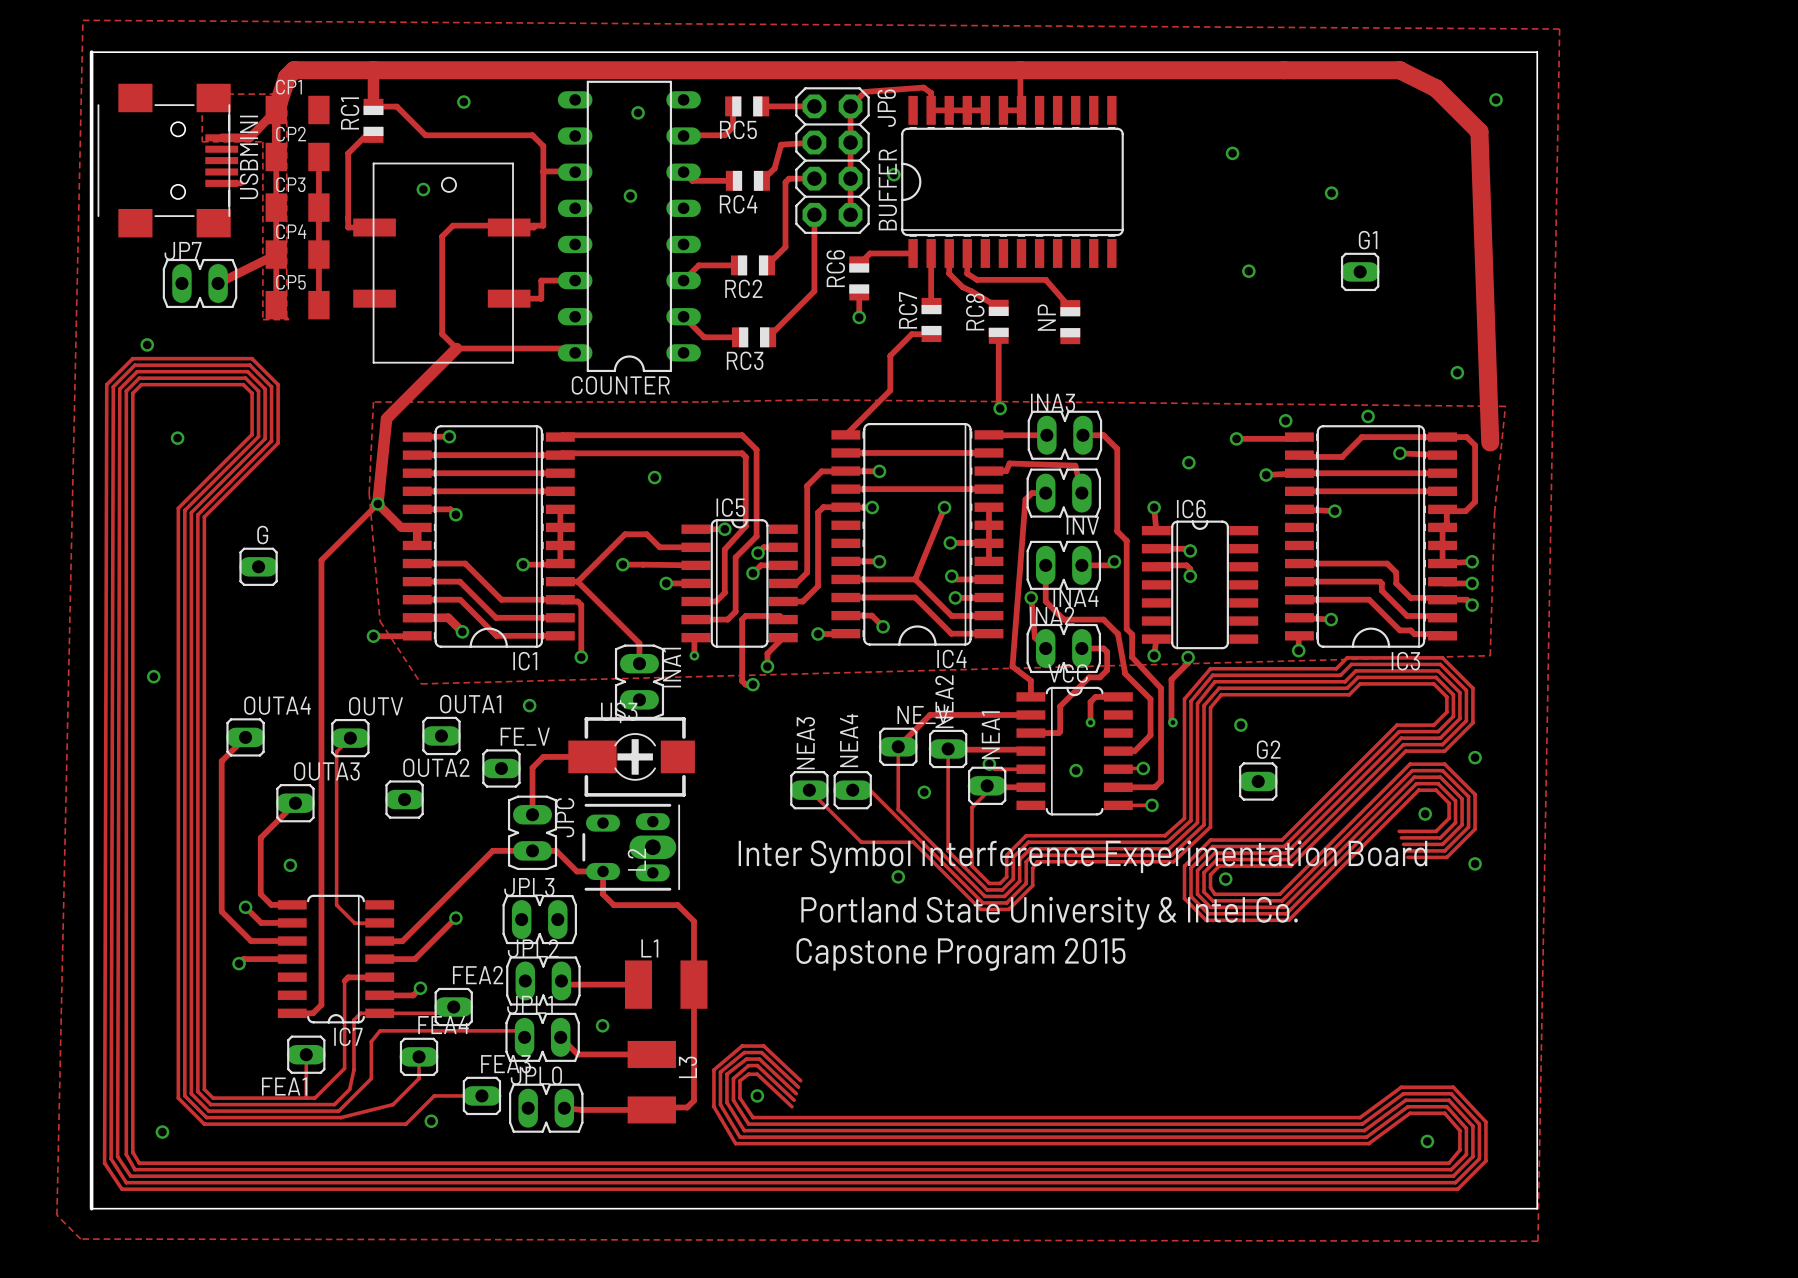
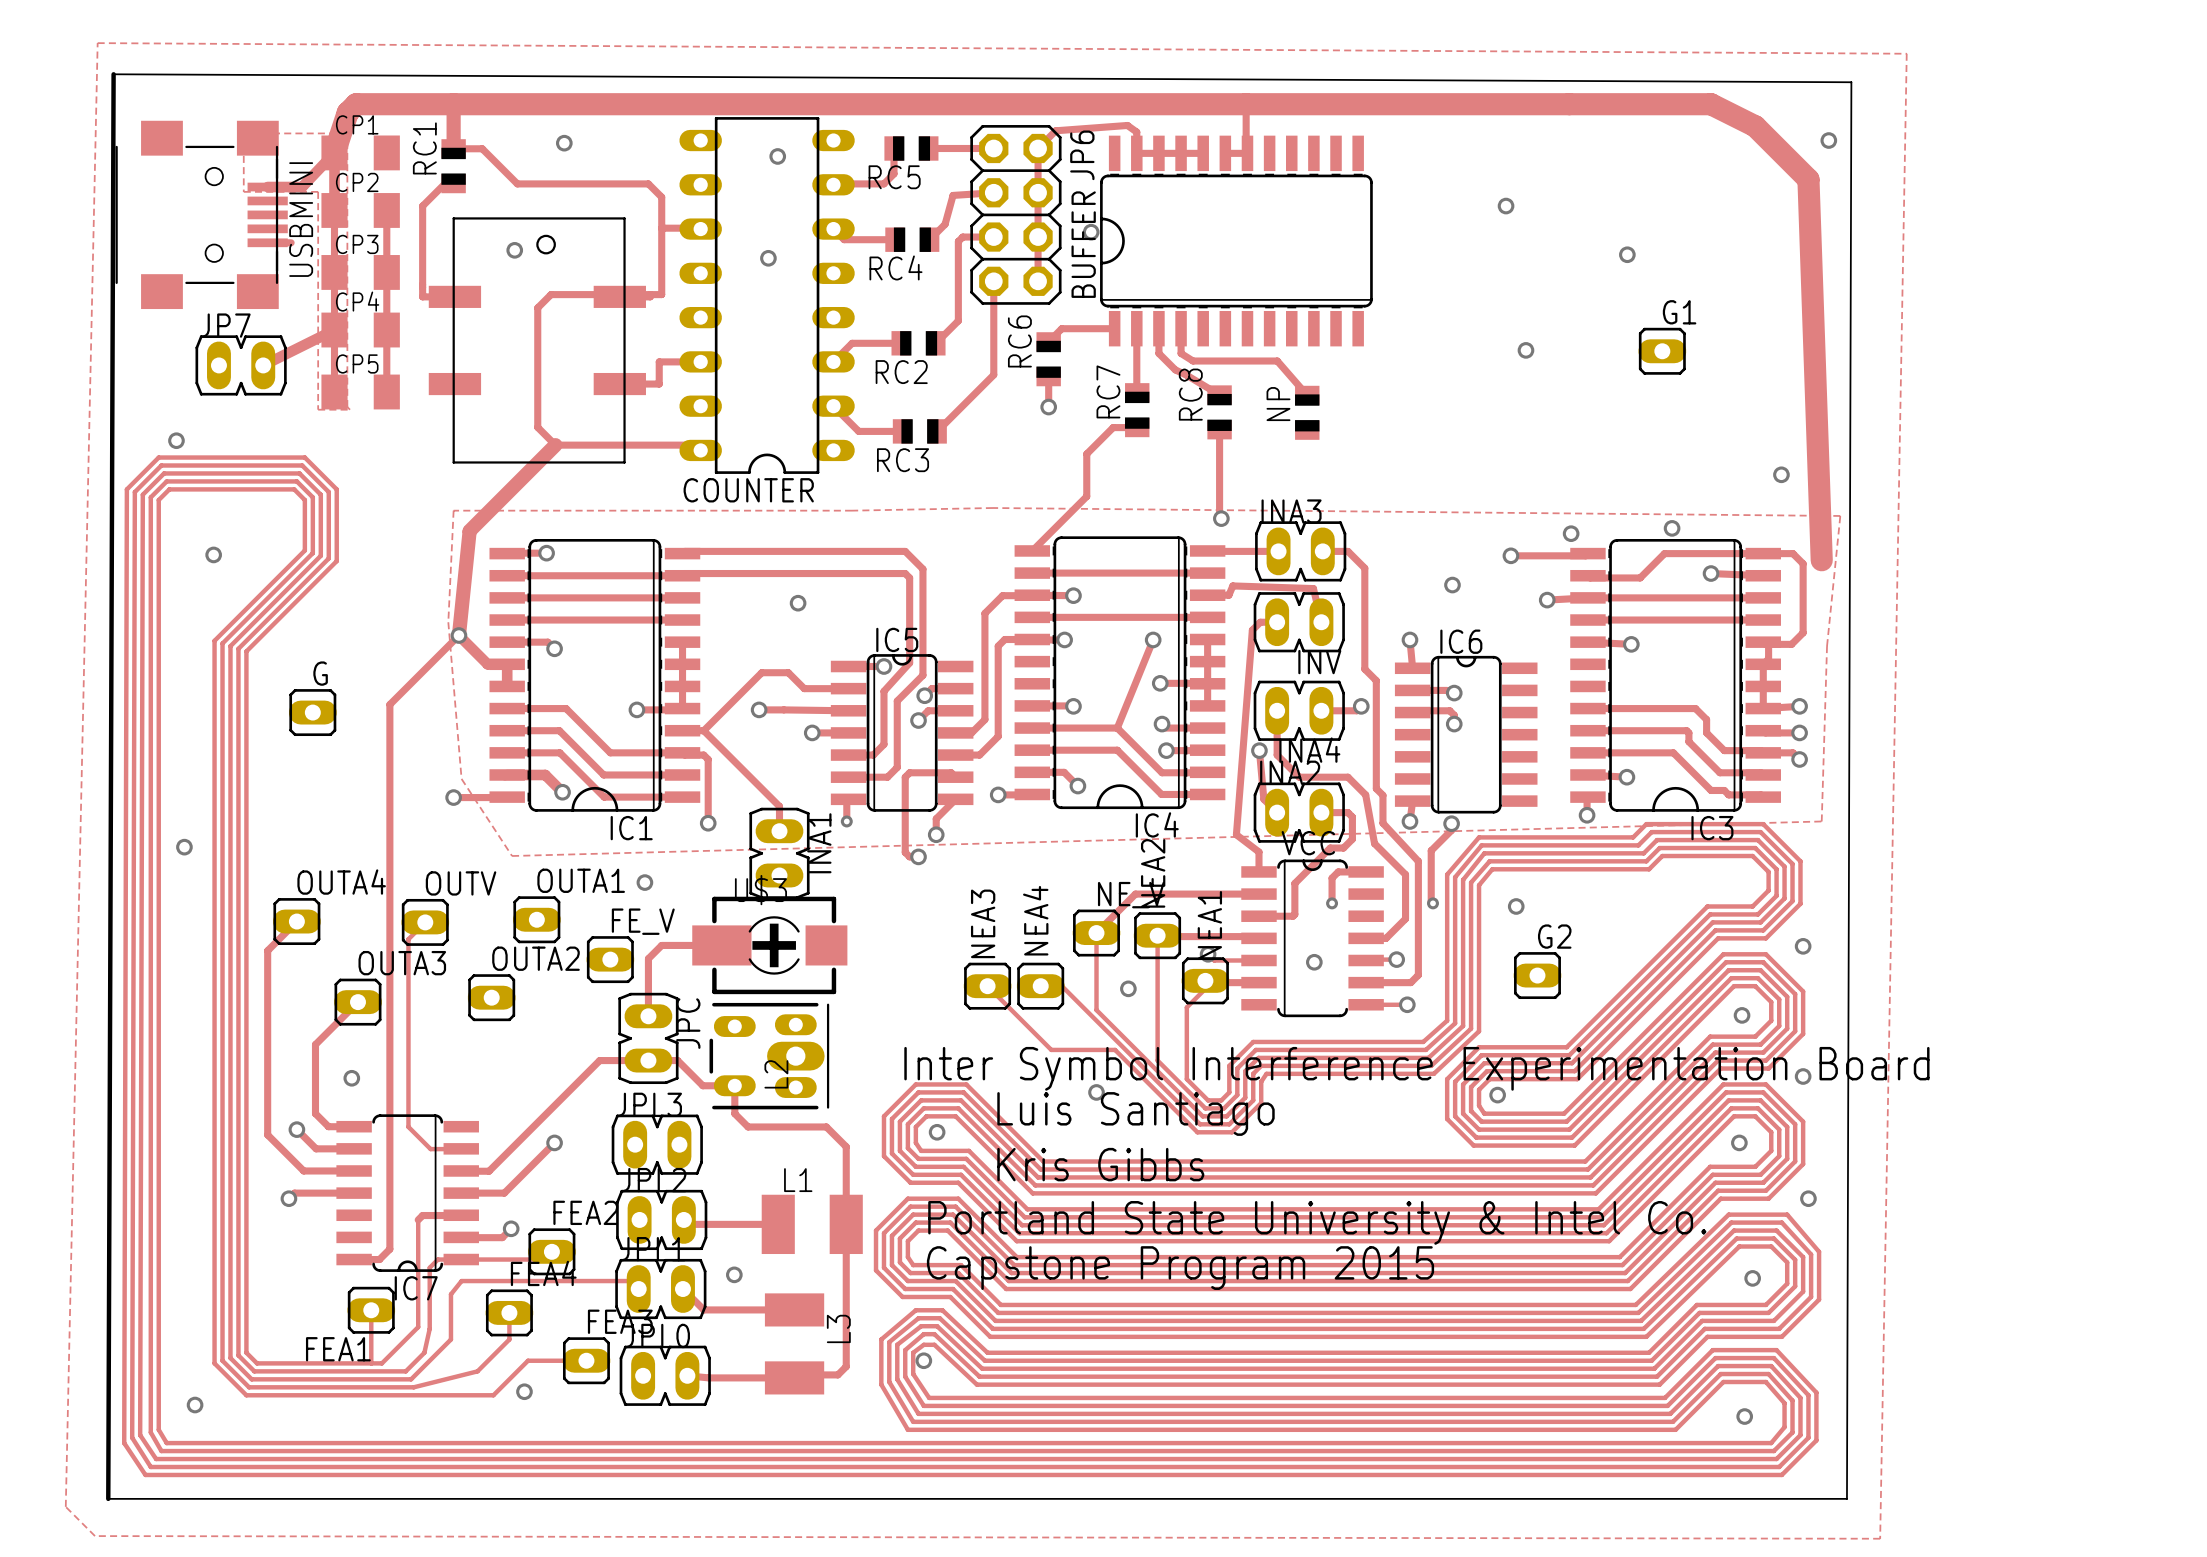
text: none -> Luis Santiago (1135, 1113)
via: none -> (937, 1132)
text position: Portland State University & Intel Co. (1049, 913) -> Portland State University & Intel Co. (1317, 1222)
via: none -> (1739, 1142)
text: none -> Kris Gibbs (1100, 1164)
text position: Capstone Program 2015 (961, 954) -> Capstone Program 2015 (1180, 1268)
via: none -> (1808, 1198)
via: none -> (1752, 1278)
track: (800, 1080) (763, 1046) (742, 1046) (713, 1069) (713, 1106) (735, 1143) (1368, 1143) (1410, 1113) -> (1710, 1036) (1585, 1161) (1043, 1161) (966, 1084) (915, 1084) (883, 1116) (883, 1156) (910, 1182) (958, 1182) (1016, 1241) (1609, 1241) (1734, 1116) (1755, 1116) (1771, 1132) (1771, 1150) (1755, 1166) (1710, 1166) (1619, 1257) (1016, 1257) (958, 1198) (907, 1198) (876, 1230) (876, 1270) (902, 1296) (950, 1296) (990, 1336) (1646, 1336) (1739, 1246) (1771, 1246) (1787, 1262) (1787, 1283) (1765, 1304) (1696, 1304) (1649, 1352) (987, 1352) (942, 1310) (915, 1310) (881, 1339) (881, 1384) (907, 1429) (1675, 1429) (1723, 1381)
track: (798, 1087) (761, 1052) (744, 1052) (720, 1072) (720, 1104) (739, 1137) (1366, 1137) (1407, 1106) -> (1712, 1044) (1587, 1169) (1040, 1169) (963, 1092) (918, 1092) (891, 1119) (891, 1153) (913, 1174) (961, 1174) (1019, 1233) (1606, 1233) (1731, 1108) (1757, 1108) (1779, 1129) (1779, 1156) (1760, 1174) (1712, 1174) (1622, 1265) (1014, 1265) (955, 1206) (910, 1206) (883, 1233) (883, 1267) (905, 1289) (953, 1289) (992, 1328) (1643, 1328) (1736, 1238) (1773, 1238) (1795, 1259) (1795, 1286) (1768, 1312) (1699, 1312) (1651, 1360) (984, 1360) (939, 1318) (918, 1318) (889, 1342) (889, 1381) (913, 1421) (1672, 1421) (1720, 1374)
track: (1401, 1087) (1360, 1117) (752, 1117) (739, 1098) (739, 1080) (748, 1074) (757, 1074) (792, 1106) -> (1712, 1350) (1664, 1397) (929, 1397) (913, 1374) (913, 1352) (923, 1344) (934, 1344) (976, 1384) (1659, 1384) (1707, 1336) (1781, 1336) (1819, 1299) (1819, 1251) (1787, 1214) (1728, 1214) (1635, 1304) (1000, 1304) (961, 1265) (913, 1265) (907, 1257) (907, 1241) (918, 1230) (947, 1230) (1006, 1289) (1630, 1289) (1720, 1198) (1768, 1198) (1803, 1164) (1803, 1121) (1765, 1084) (1723, 1084) (1598, 1209) (1027, 1209) (968, 1150) (921, 1150) (915, 1142) (915, 1126) (926, 1116) (955, 1116) (1032, 1193) (1595, 1193) (1720, 1068)
track: (796, 1093) (759, 1059) (746, 1059) (726, 1074) (726, 1102) (744, 1130) (1364, 1130) (1405, 1100) -> (1715, 1052) (1590, 1177) (1038, 1177) (961, 1100) (921, 1100) (899, 1121) (899, 1150) (915, 1166) (963, 1166) (1022, 1225) (1603, 1225) (1728, 1100) (1760, 1100) (1787, 1126) (1787, 1158) (1763, 1182) (1715, 1182) (1625, 1273) (1011, 1273) (953, 1214) (913, 1214) (891, 1235) (891, 1265) (907, 1281) (955, 1281) (995, 1320) (1641, 1320) (1734, 1230) (1776, 1230) (1803, 1257) (1803, 1291) (1773, 1320) (1702, 1320) (1654, 1368) (982, 1368) (937, 1326) (921, 1326) (897, 1344) (897, 1379) (918, 1413) (1670, 1413) (1718, 1366)
track: (1403, 1093) (1362, 1124) (748, 1124) (733, 1100) (733, 1078) (748, 1065) (757, 1065) (794, 1100) -> (1715, 1358) (1667, 1405) (923, 1405) (905, 1376) (905, 1350) (923, 1334) (934, 1334) (979, 1376) (1657, 1376) (1704, 1328) (1779, 1328) (1811, 1296) (1811, 1254) (1781, 1222) (1731, 1222) (1638, 1312) (998, 1312) (958, 1273) (910, 1273) (899, 1262) (899, 1238) (915, 1222) (950, 1222) (1008, 1281) (1627, 1281) (1718, 1190) (1765, 1190) (1795, 1161) (1795, 1124) (1763, 1092) (1726, 1092) (1601, 1217) (1024, 1217) (966, 1158) (918, 1158) (907, 1148) (907, 1124) (923, 1108) (958, 1108) (1035, 1185) (1593, 1185) (1718, 1060)
board edge: (91, 1208) (91, 52) (1537, 52) (1537, 1208) (1510, 1208) -> (108, 1498) (113, 74) (1851, 82) (1846, 1498)

